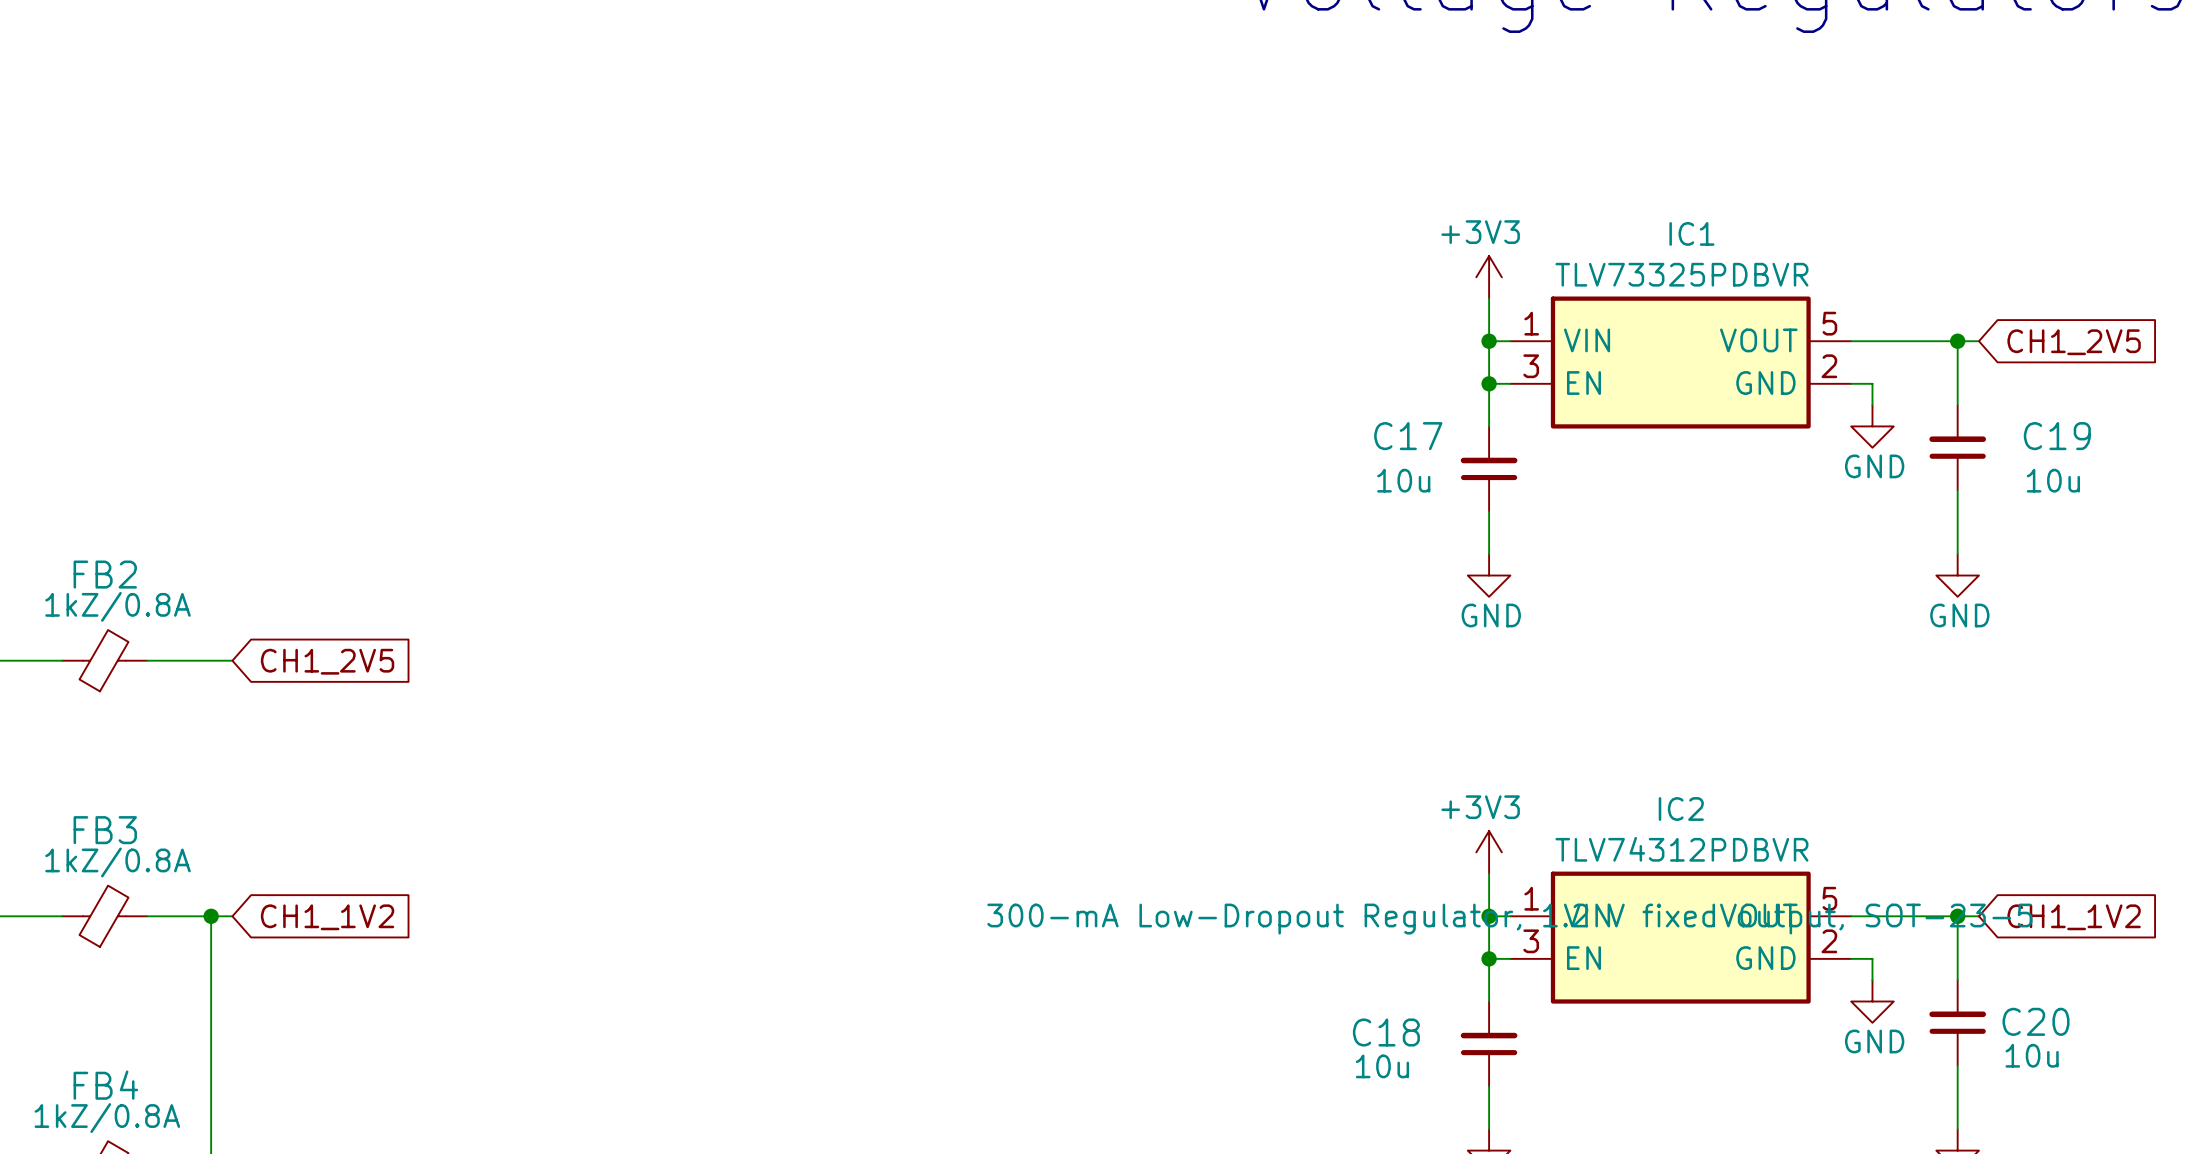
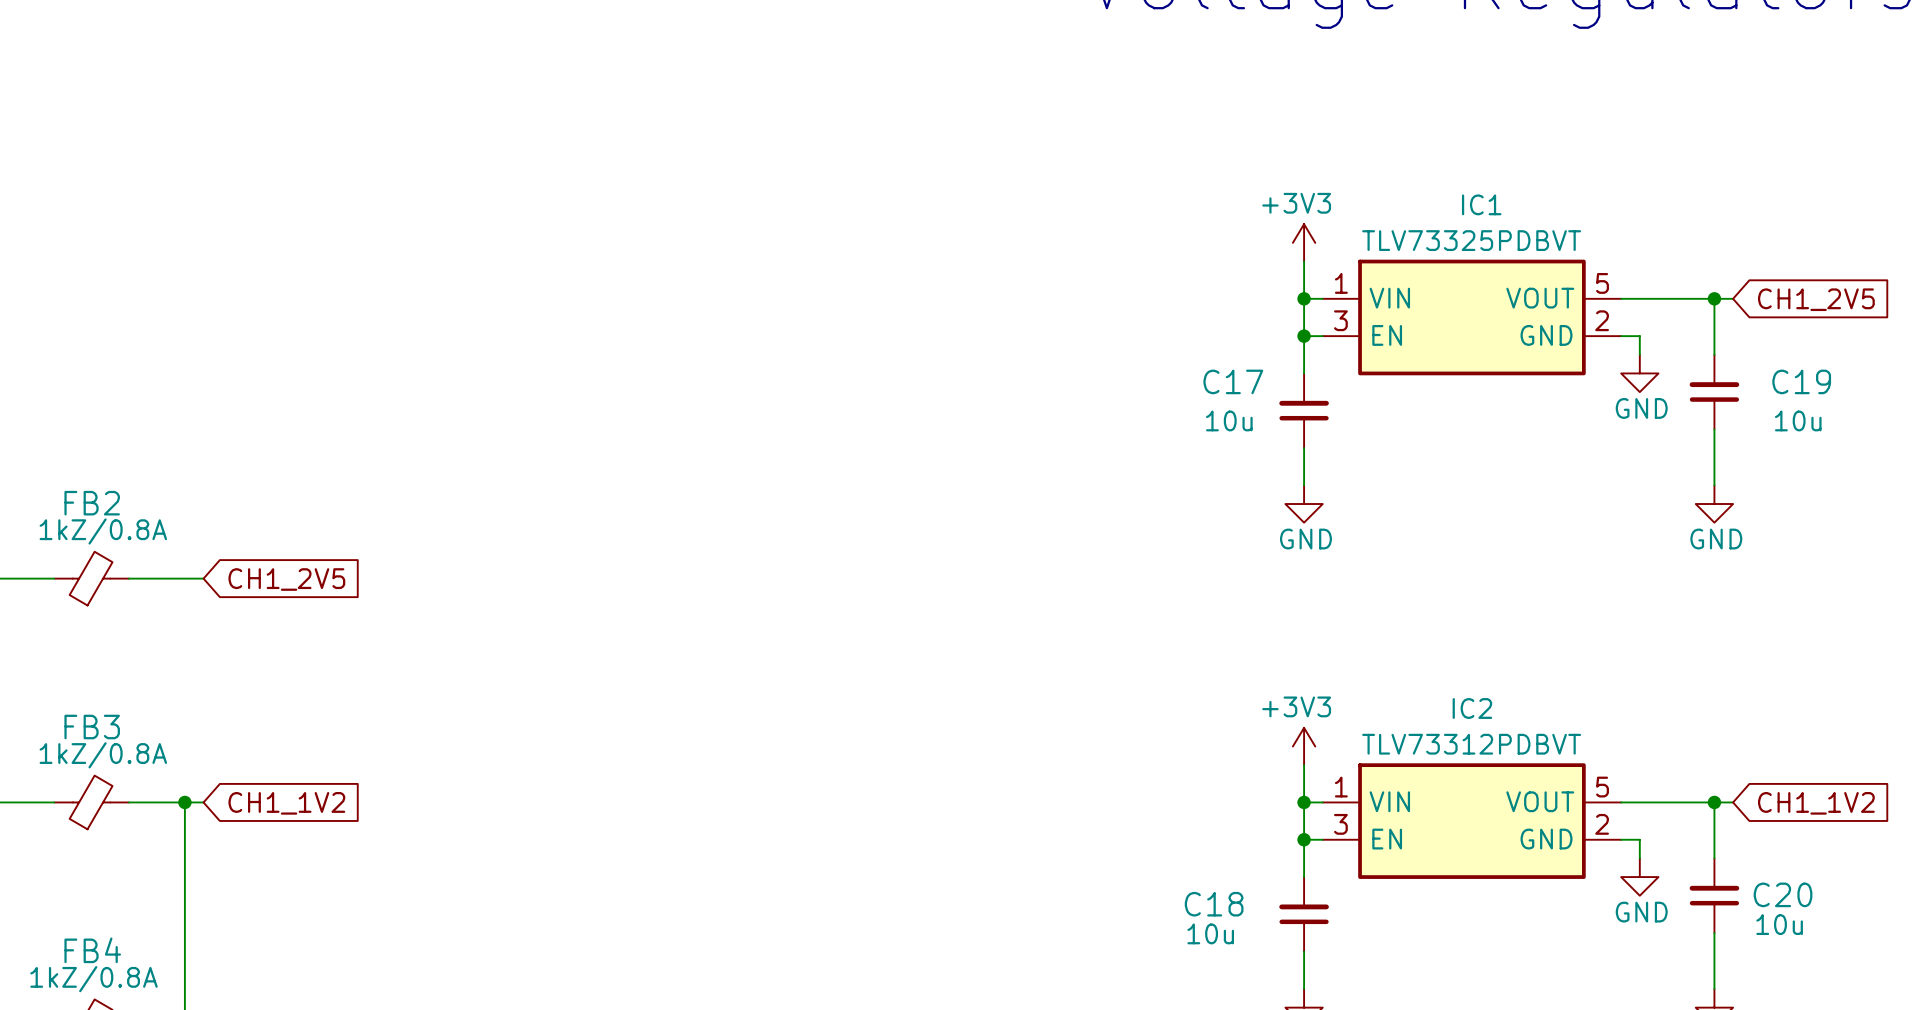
IC1 text: TLV73325PDBVR (1681, 274) -> TLV73325PDBVT (1471, 240)
IC2 text: TLV74312PDBVR (1681, 849) -> TLV73312PDBVT (1471, 744)
IC2 text: 300-mA Low-Dropout Regulator, 1.2 V fixed output, SOT-23-5 (1509, 919) -> none

